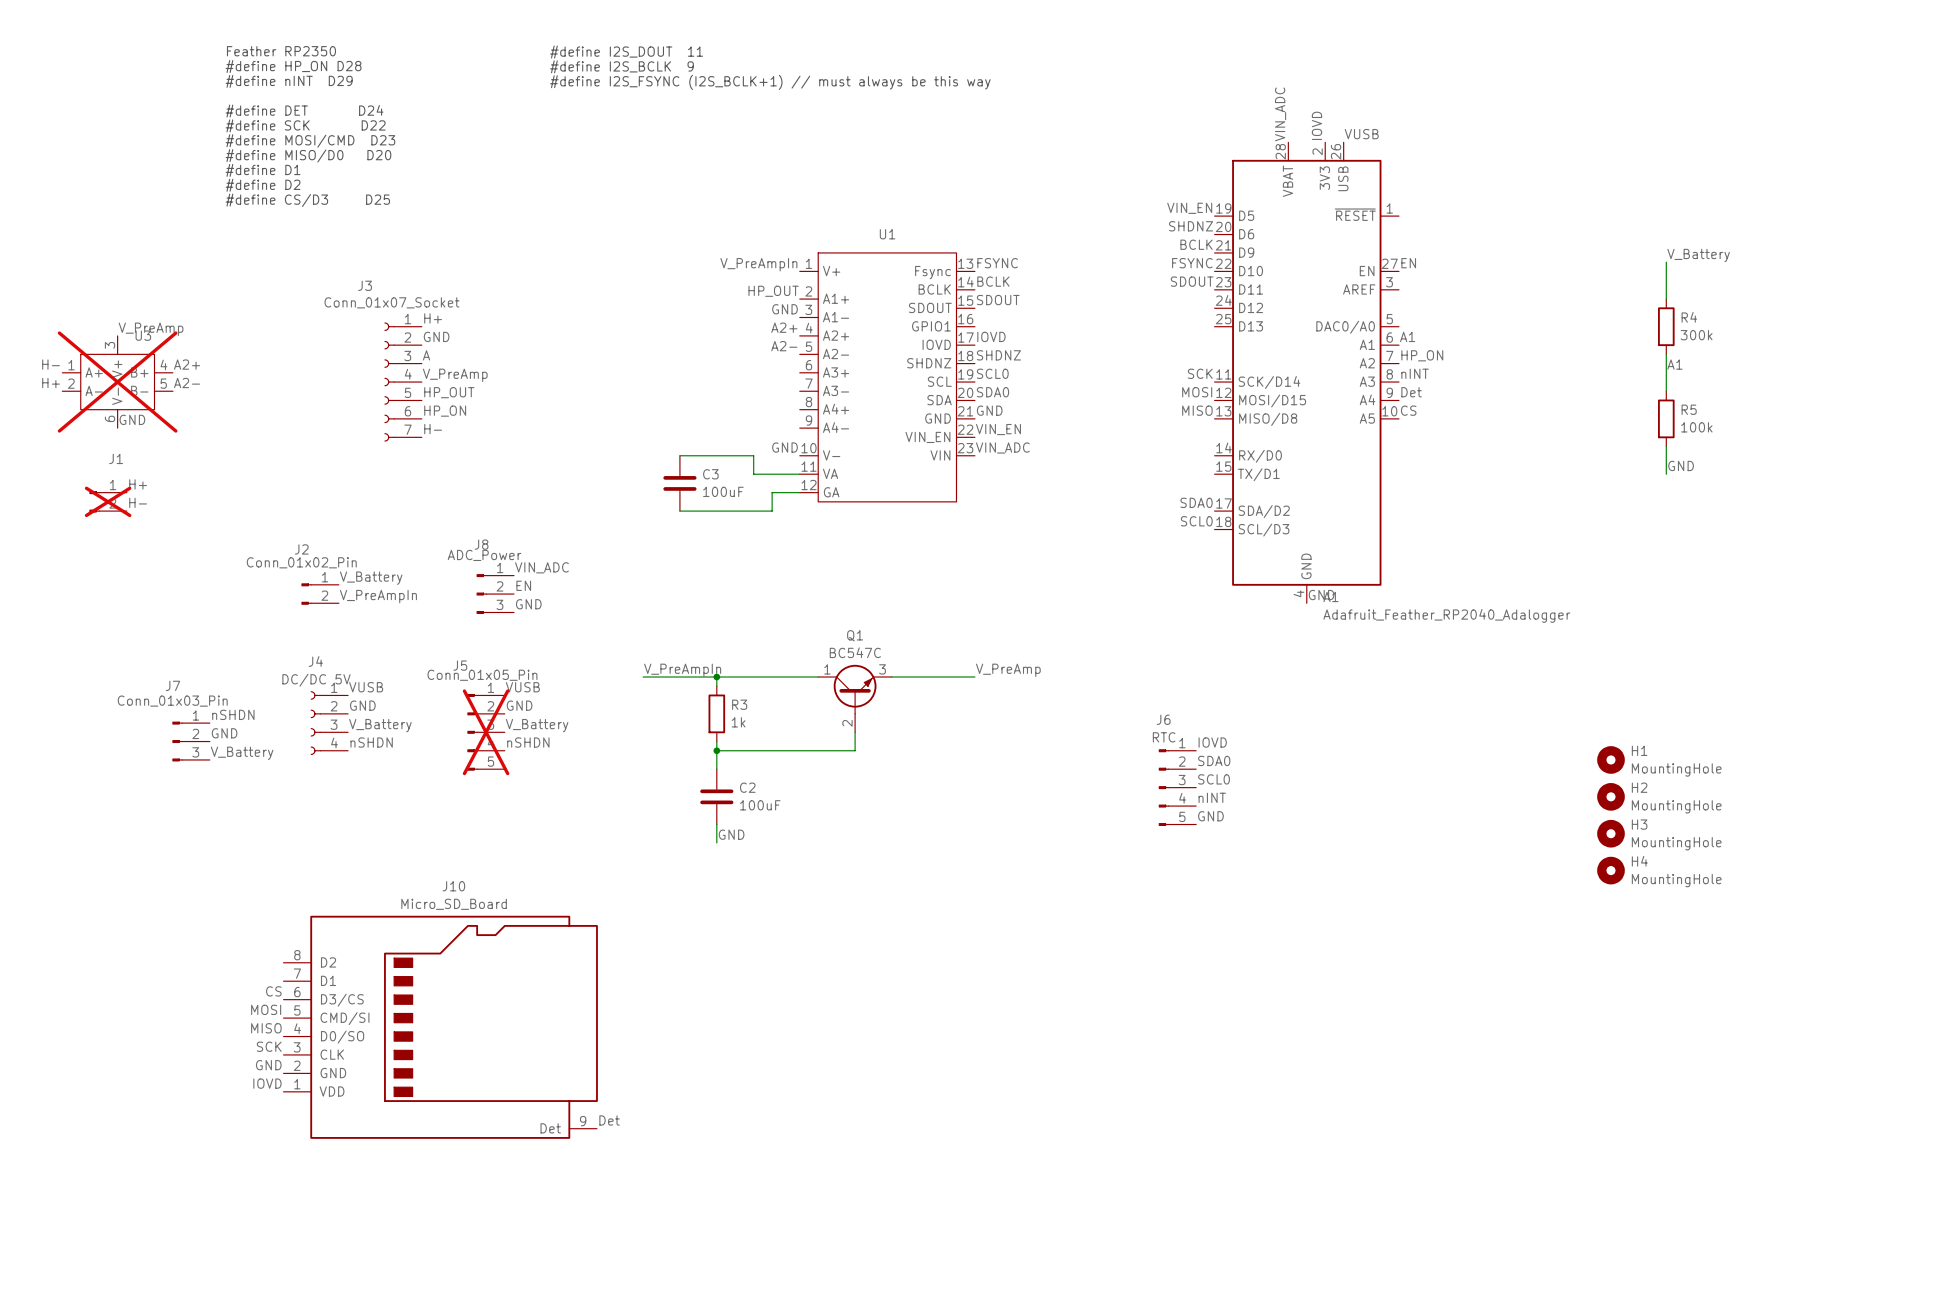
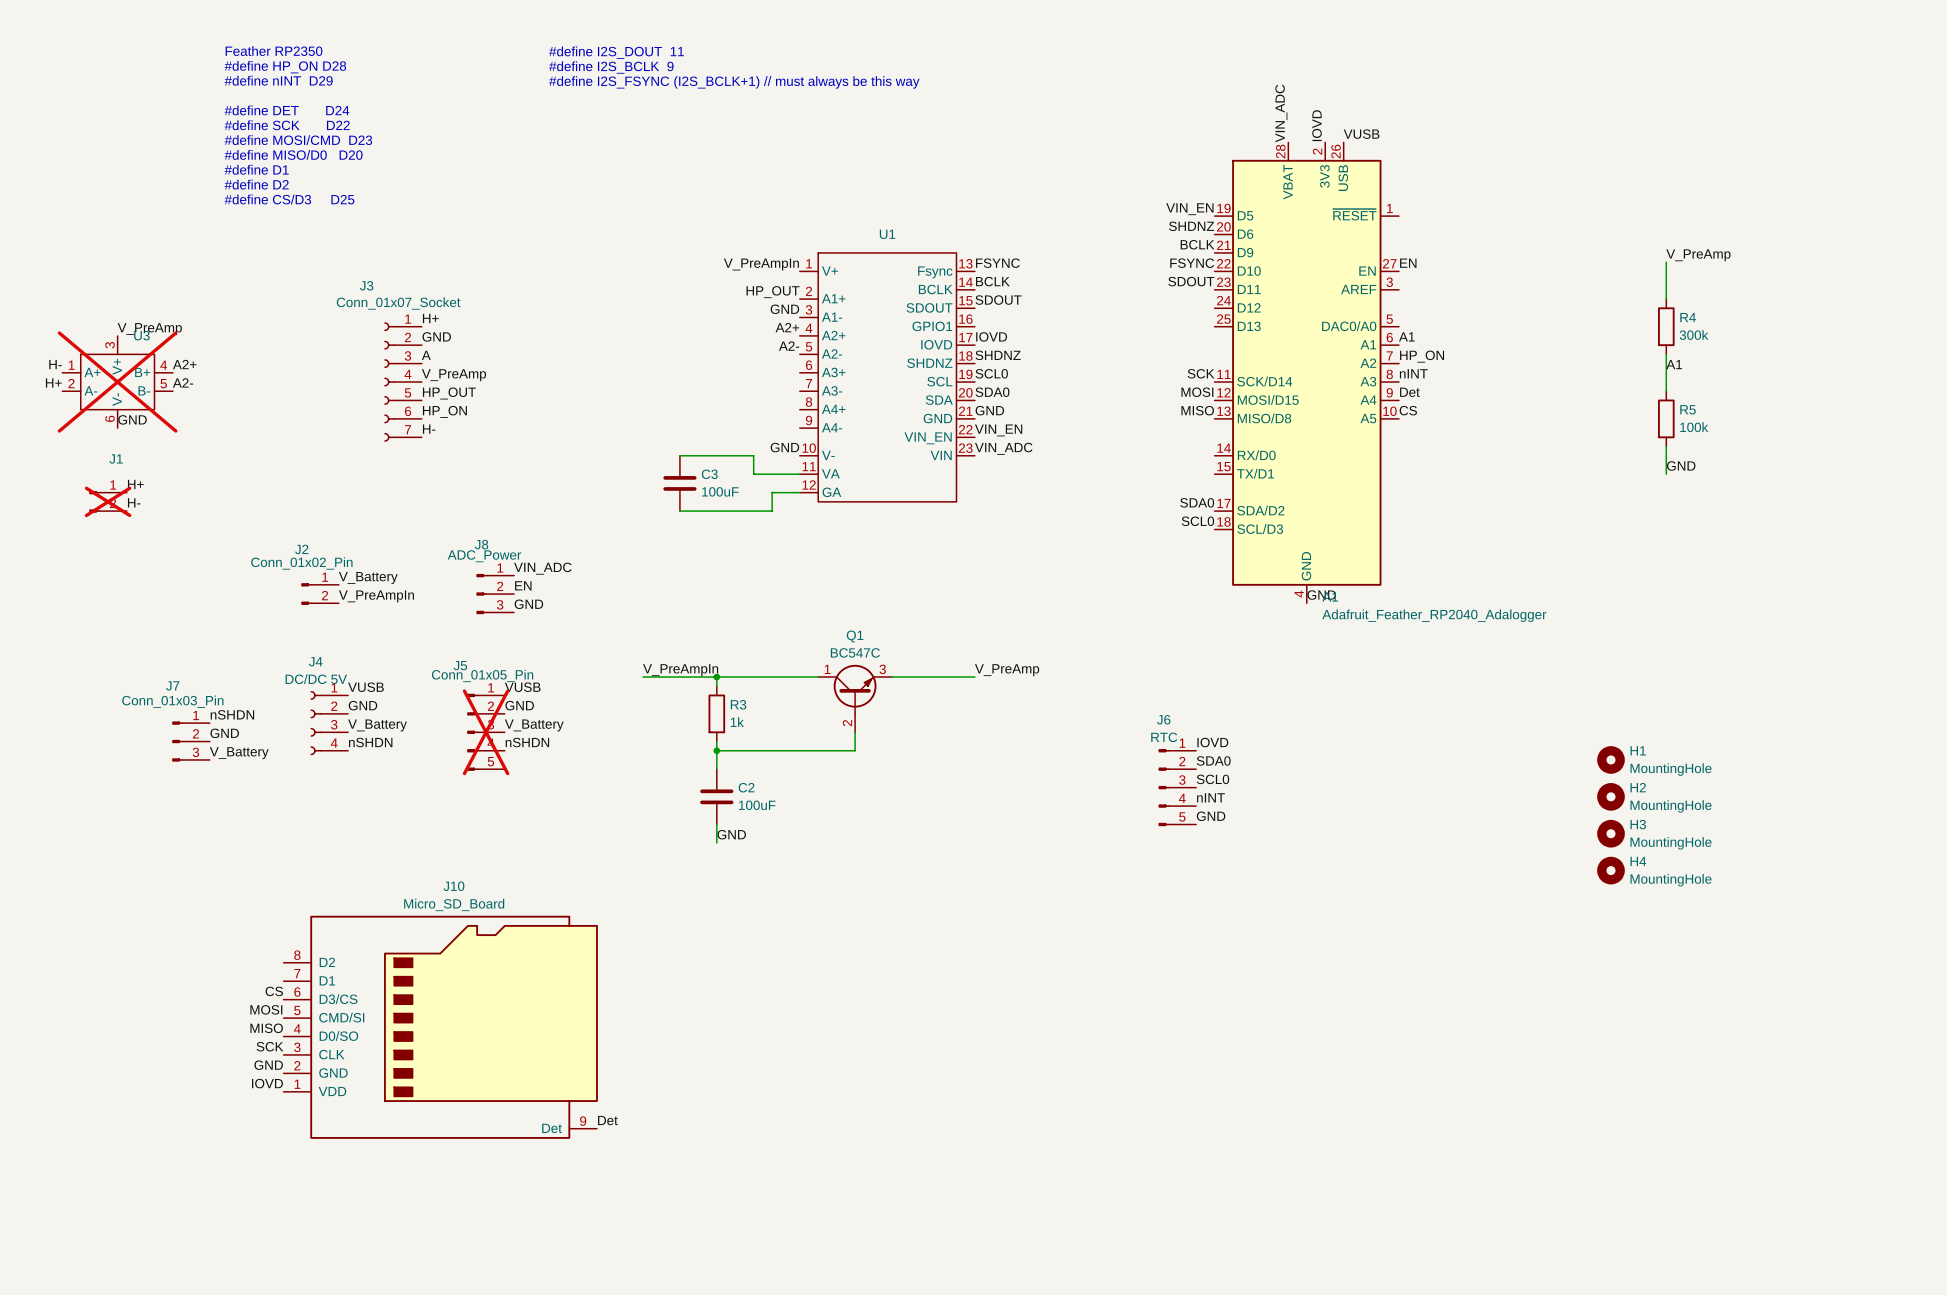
label: V_Battery (1698, 255) -> V_PreAmp (1698, 255)

